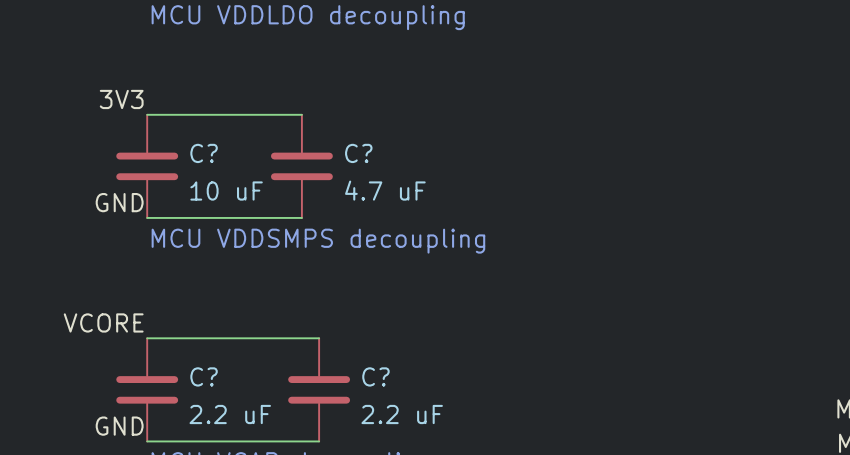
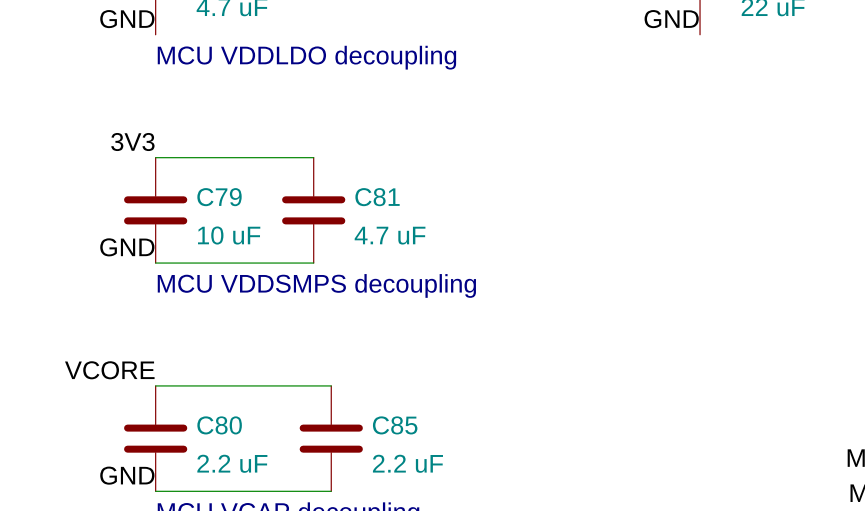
C? name: C? (204, 153) -> C79 (219, 197)
C? name: C? (358, 153) -> C81 (377, 197)
C? name: C? (204, 376) -> C80 (219, 425)
C? name: C? (375, 376) -> C85 (395, 425)

